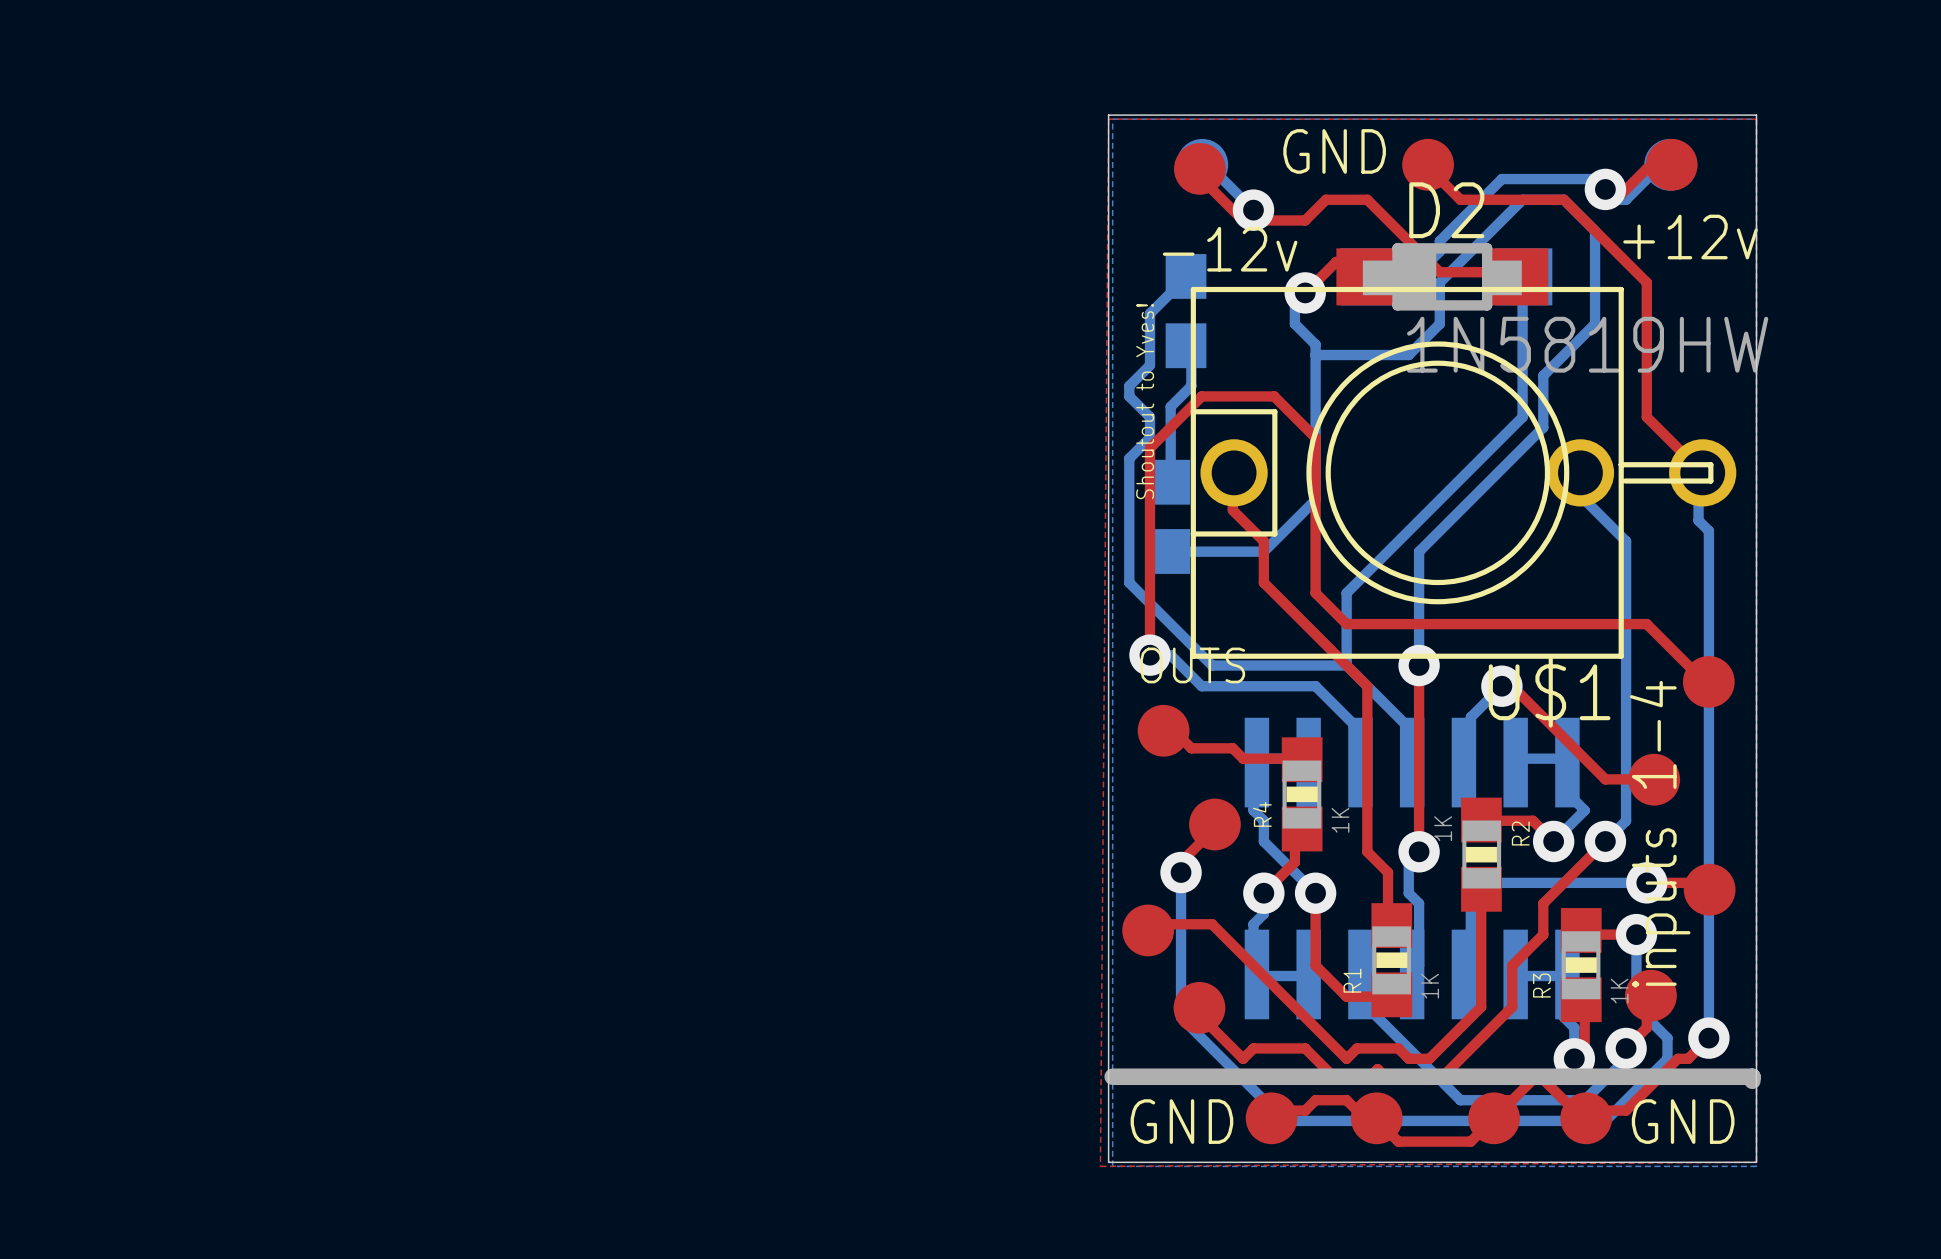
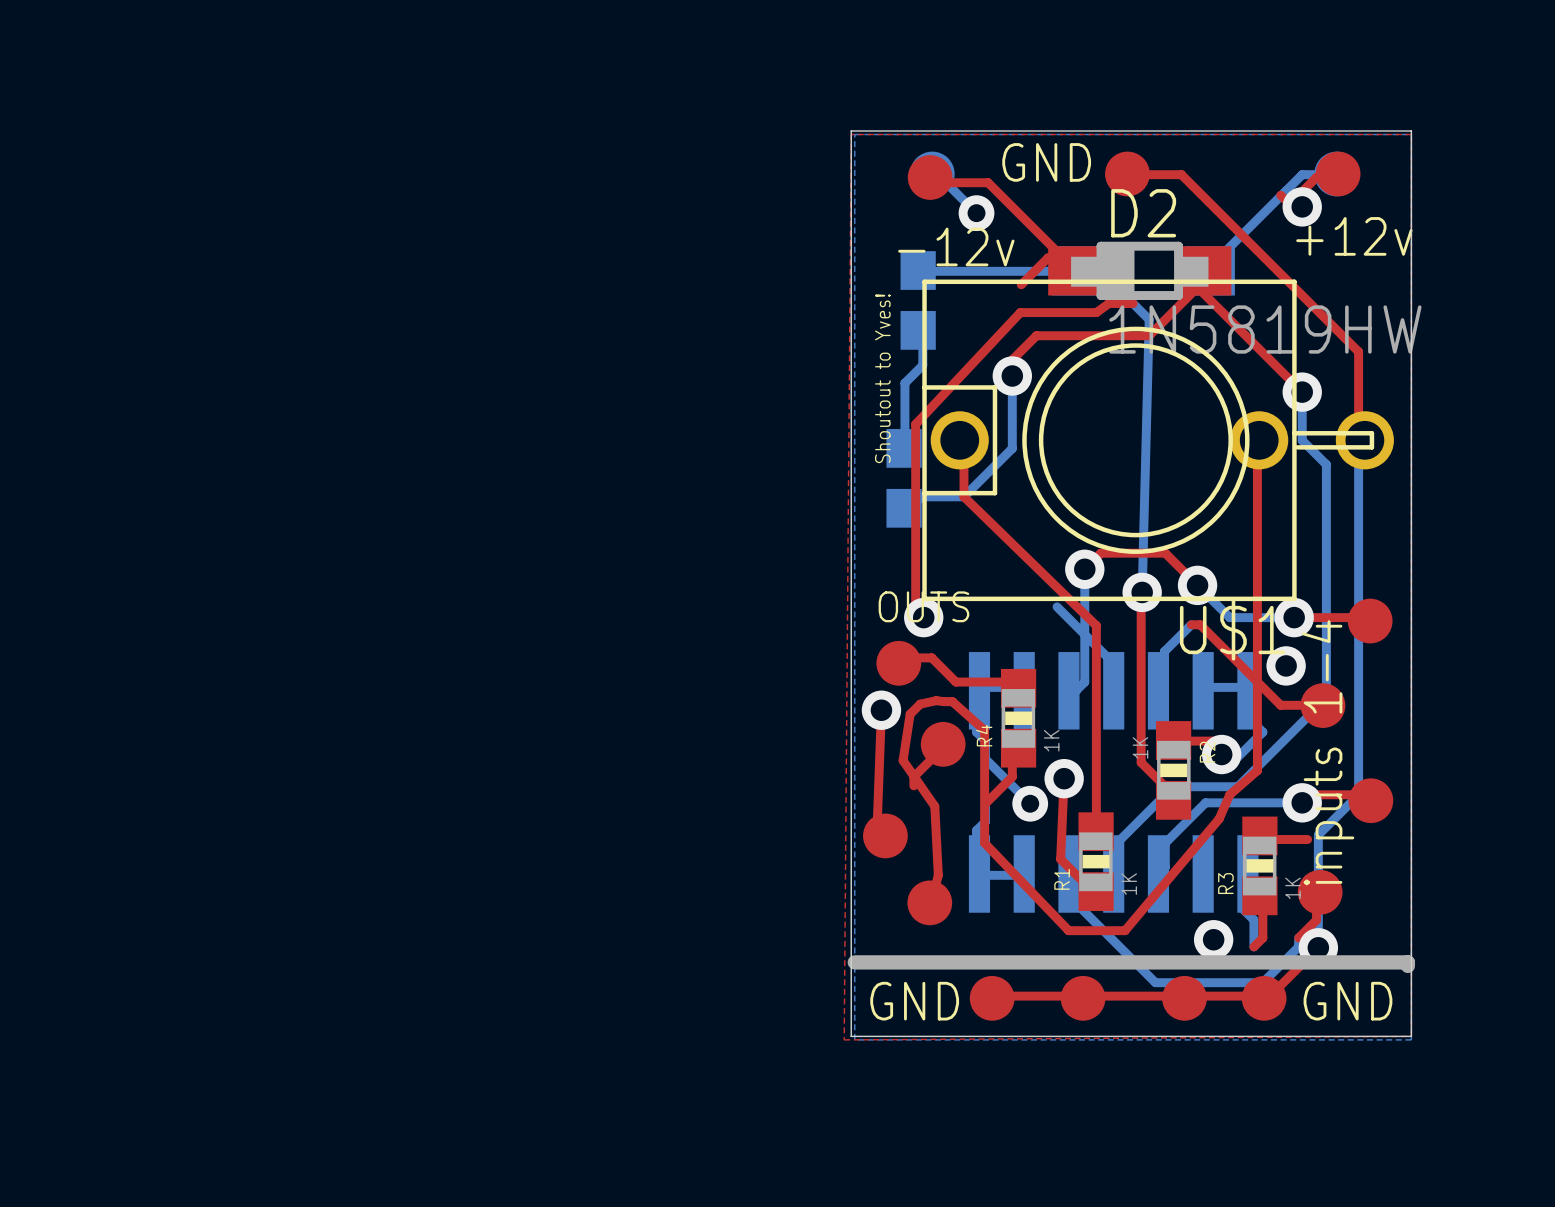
top track: (1428, 164) (1429, 168) (1460, 199) (1564, 199) (1646, 282) (1646, 417) (1702, 472) -> (1127, 173) (1181, 174) (1358, 351) (1358, 432) (1364, 440)
bottom track: (1670, 164) (1667, 168) (1657, 168) (1626, 199) (1615, 199) (1595, 179) (1501, 179) (1439, 241) (1439, 251) (1398, 292) (1388, 292) (1368, 276) -> (1336, 173) (1302, 174) (1213, 263) (1210, 270)
top track: (1199, 168) (1201, 179) (1243, 220) (1305, 220) (1325, 199) (1367, 199) (1439, 272) (1512, 272) (1519, 276) -> (930, 177) (931, 182) (988, 182) (1068, 263) (1072, 270)
via position: (1605, 189) -> (1302, 206)
bottom track: (1186, 276) (1150, 313) (1150, 365) (1129, 386) (1129, 396) (1150, 417) (1150, 437) (1129, 458) (1129, 582) (1212, 665) (1346, 665) (1346, 593) (1522, 417) (1523, 276) -> (918, 270) (1076, 270)
bottom track: (1305, 292) (1294, 303) (1294, 323) (1315, 344) (1315, 499) (1263, 551) (1169, 551) -> (1012, 376) (1012, 448) (963, 496) (923, 496) (904, 508)
via: (1305, 292) -> none
top track: none -> (1133, 303) (1108, 303) (1096, 312) (1020, 312) (915, 424) (915, 609) (923, 617)
bottom track: none -> (1133, 303) (1149, 319) (1142, 592)
bottom track: (1315, 355) (1408, 355) (1439, 323) (1439, 282) (1522, 199) (1564, 199) (1595, 230) (1595, 323) (1543, 375) (1543, 427) (1419, 551) (1419, 665) -> none
top track: none -> (1012, 376) (1012, 359) (1036, 335) (1149, 335) (1213, 271) (1206, 270) (1197, 287) (1302, 392)
via: none -> (1012, 376)
via: none -> (1302, 392)
top track: (1234, 472) (1232, 510) (1263, 541) (1263, 582) (1367, 686) (1367, 851) (1388, 872) (1388, 924) (1391, 925) -> (959, 440) (963, 440) (963, 496) (1096, 625) (1096, 831)
bottom track: (1580, 472) (1584, 479) (1584, 499) (1626, 541) (1626, 820) (1605, 841) -> none
bottom track: (1702, 472) (1698, 479) (1698, 520) (1708, 530) (1708, 1038) -> (1364, 440) (1358, 440) (1358, 794) (1318, 835) (1318, 947)
top track: none -> (1084, 569) (1100, 553) (1165, 553) (1197, 585)
via: none -> (1084, 569)
bottom track: none -> (1197, 585) (1229, 617) (1294, 617)
via: none -> (1197, 585)
top track: none -> (1142, 592) (1141, 762) (1173, 794) (1173, 800)
top track: (1150, 655) (1150, 448) (1201, 396) (1274, 396) (1315, 437) (1315, 593) (1346, 624) (1646, 624) (1698, 675) (1708, 681) -> (1294, 617) (1366, 617) (1370, 621)
bottom track: (1150, 655) (1170, 655) (1201, 686) (1315, 686) (1357, 727) (1357, 758) (1360, 762) -> (1084, 569) (1084, 682) (1076, 690) (1068, 690)
via: (1150, 655) -> none
top track: (1419, 665) (1419, 851) -> none
via position: (1419, 665) -> (1142, 592)
via: none -> (923, 617)
via: none -> (1294, 617)
via: (1501, 686) -> none
top track: (1163, 730) (1170, 727) (1181, 727) (1181, 737) (1191, 748) (1232, 748) (1243, 758) (1302, 759) -> (898, 663) (891, 657) (931, 657) (955, 682) (1012, 682) (1018, 688)
via: none -> (1286, 665)
via: none -> (881, 710)
via position: (1553, 841) -> (1221, 754)
top track: (1605, 841) (1543, 903) (1543, 934) (1512, 965) (1512, 1007) (1439, 1079) (1388, 1079) (1377, 1069) (1367, 1079) (1336, 1079) (1305, 1048) (1253, 1048) (1243, 1058) (1201, 1017) (1199, 1007) -> (1259, 440) (1257, 440) (1257, 770) (1229, 794) (1219, 818) (1125, 930) (1068, 930) (984, 843) (984, 730) (952, 701) (936, 700) (920, 704) (910, 714) (903, 760) (934, 806) (938, 875) (929, 902)
via: (1605, 841) -> none
bottom track: (1419, 851) (1408, 862) (1408, 893) (1419, 903) (1419, 965) (1412, 974) -> (1302, 392) (1302, 440) (1326, 464) (1326, 698) (1237, 786) (1173, 786) (1117, 843) (1117, 867) (1113, 873)
via: (1419, 851) -> none
via: none -> (1064, 778)
bottom track: (1181, 872) (1181, 1017) (1284, 1120) (1605, 1120) (1667, 1058) (1667, 1038) (1636, 1007) (1636, 934) -> none
via: (1181, 872) -> none
bottom track: (1646, 882) (1491, 882) (1470, 903) (1470, 965) (1463, 974) -> (1302, 802) (1205, 802) (1165, 843) (1165, 867) (1158, 873)
via position: (1646, 882) -> (1302, 802)
top track: (1481, 889) (1481, 1007) (1429, 1058) (1408, 1058) (1398, 1048) (1357, 1048) (1346, 1058) (1212, 924) (1150, 924) (1148, 930) -> (881, 710) (877, 818) (885, 835)
via: (1263, 893) -> none
top track: (1315, 893) (1315, 965) (1346, 996) (1388, 996) (1391, 994) -> (1064, 778) (1060, 859) (1092, 891) (1096, 891)
via: (1636, 934) -> none
bottom track: (1515, 974) (1564, 976) -> none
top track: (1708, 1038) (1688, 1058) (1677, 1058) (1626, 1110) (1595, 1110) (1586, 1118) (1584, 1110) (1574, 1110) (1543, 1079) (1532, 1079) (1512, 1100) (1491, 1100) (1494, 1118) (1470, 1141) (1398, 1141) (1377, 1120) (1367, 1131) (1357, 1120) (1357, 1110) (1346, 1100) (1315, 1100) (1305, 1110) (1274, 1110) (1271, 1118) -> (1318, 947) (1270, 996) (1264, 998) (1261, 996) (1189, 996) (1184, 998) (1181, 996) (1084, 996) (1083, 998) (1076, 996) (996, 996) (992, 998)
via: (1708, 1038) -> none
via position: (1626, 1048) -> (1318, 947)
via: none -> (1213, 939)
via: (1574, 1058) -> none

